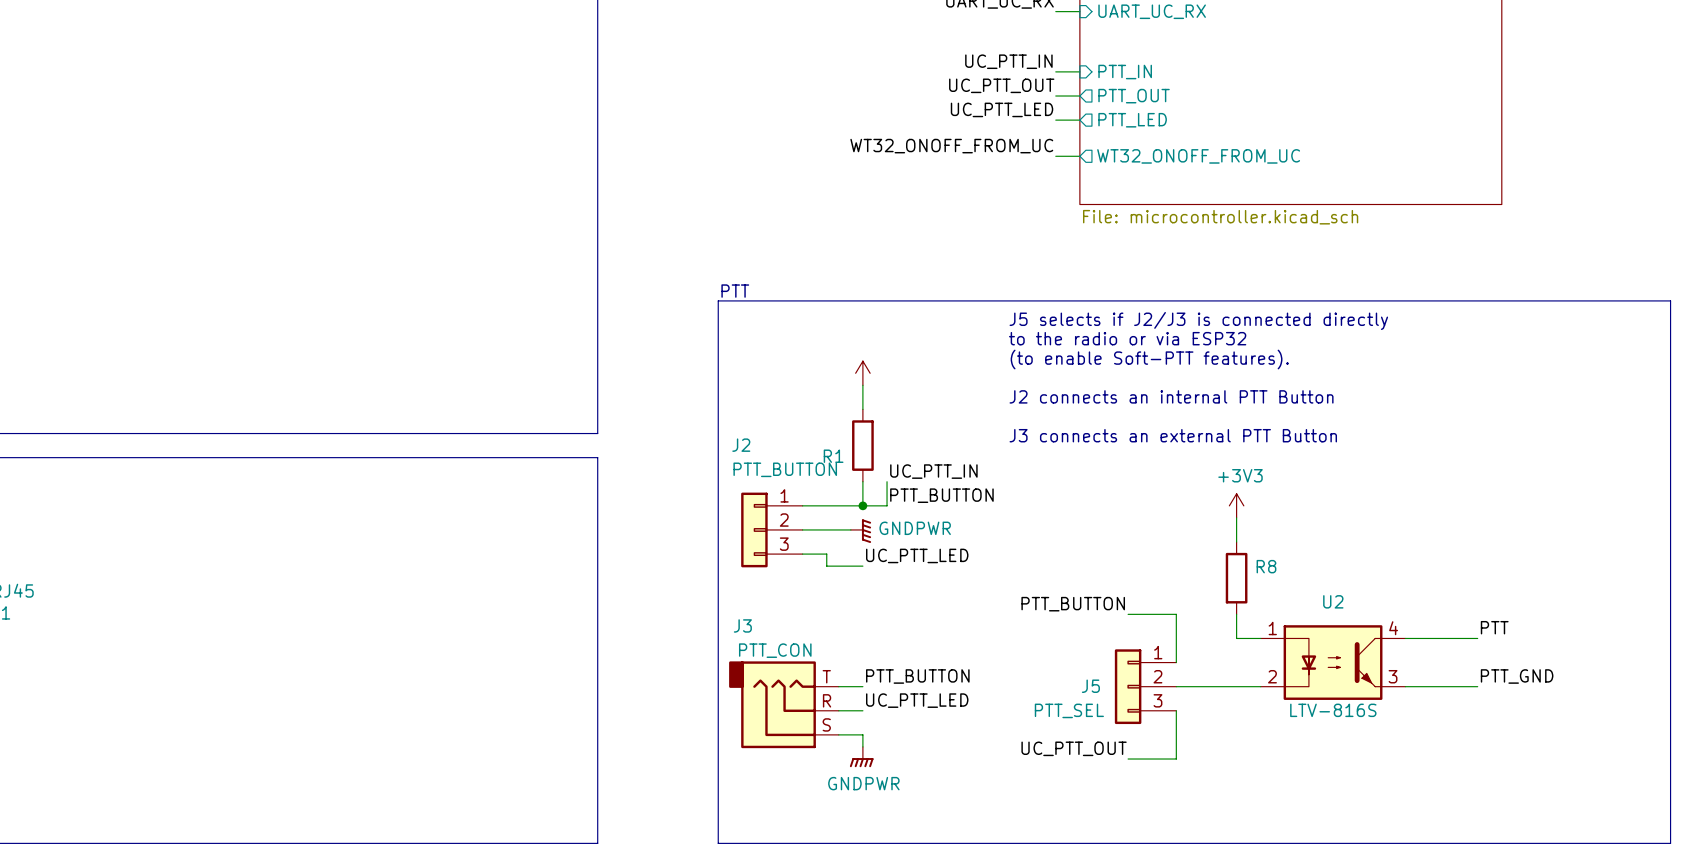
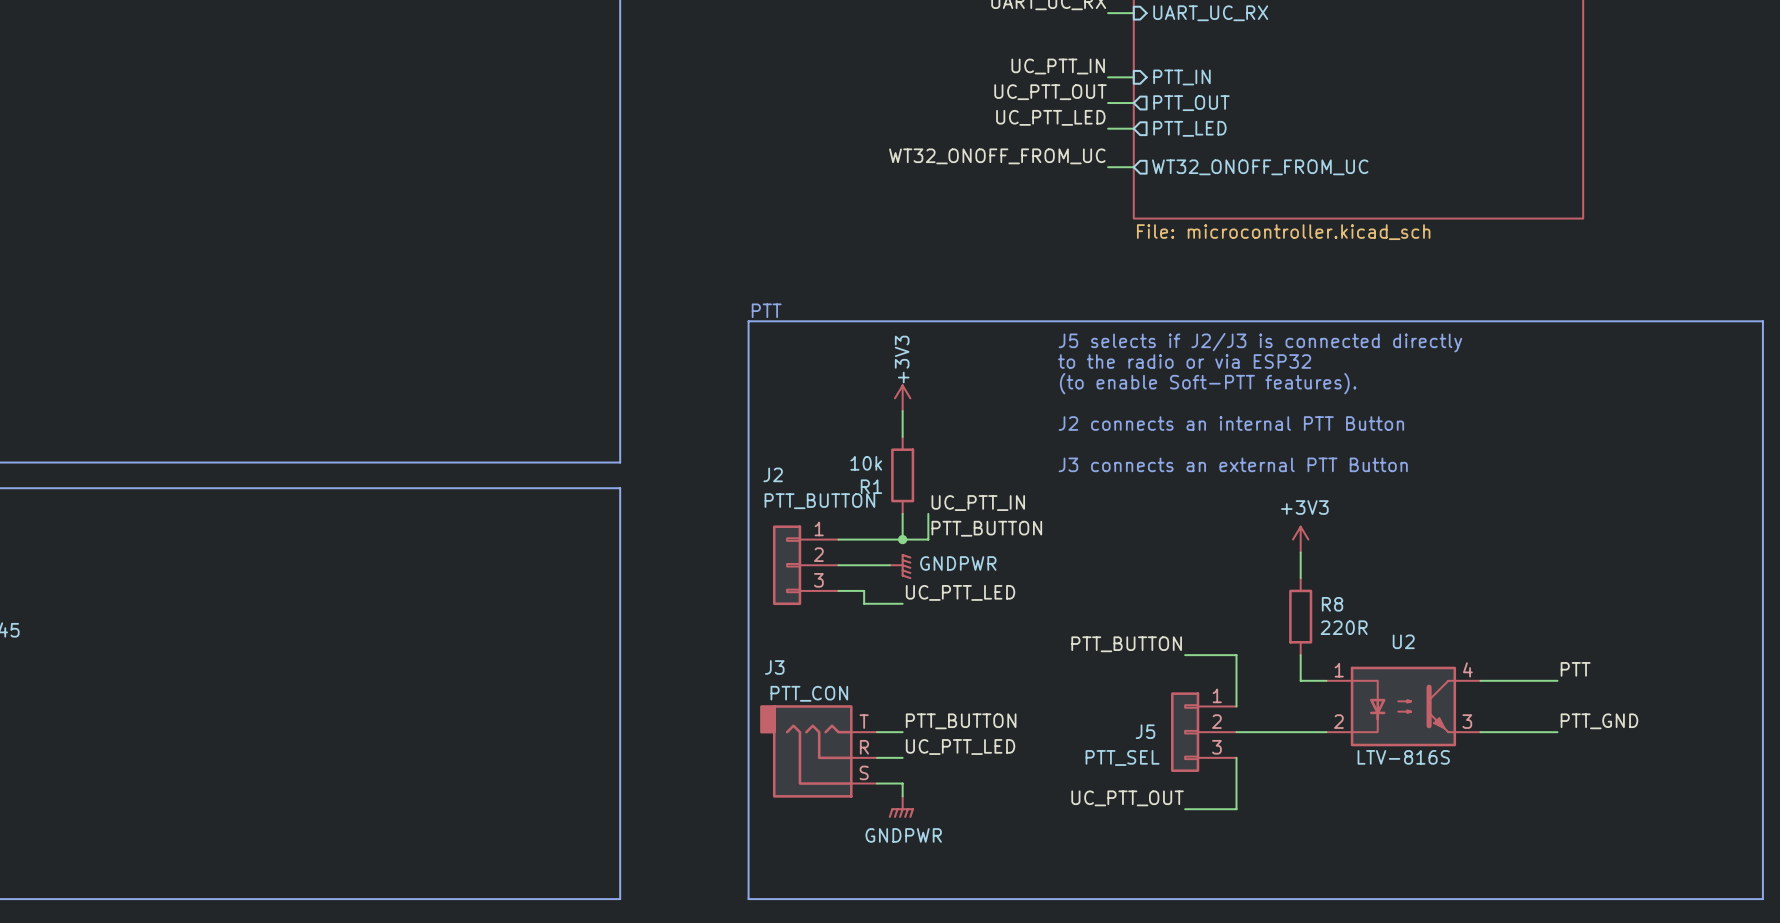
power symbol text: none -> +3V3 (902, 359)
R1 value: none -> 10k (866, 463)
R8 value: none -> 220R (1344, 627)

